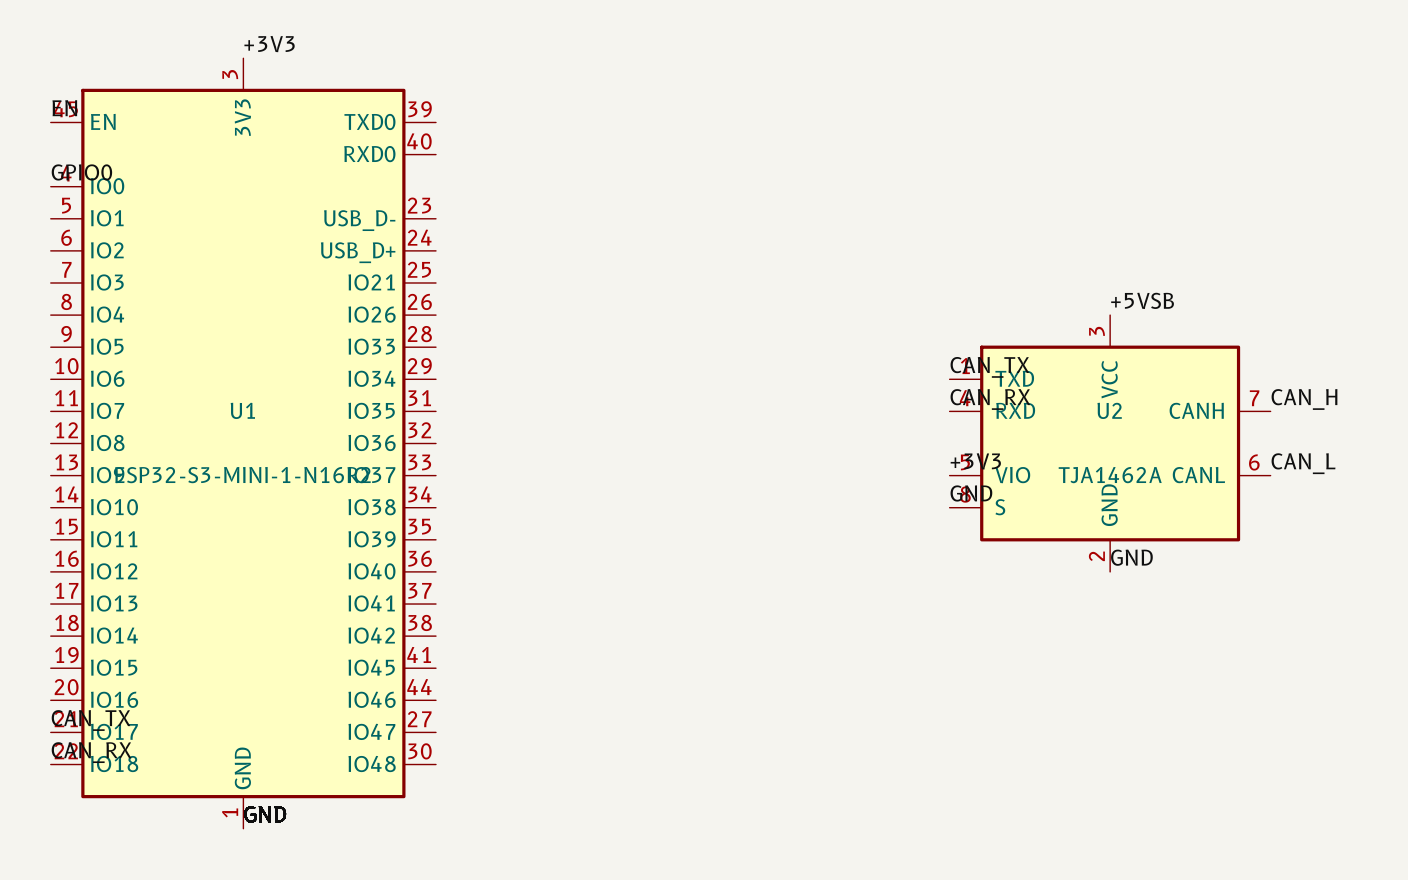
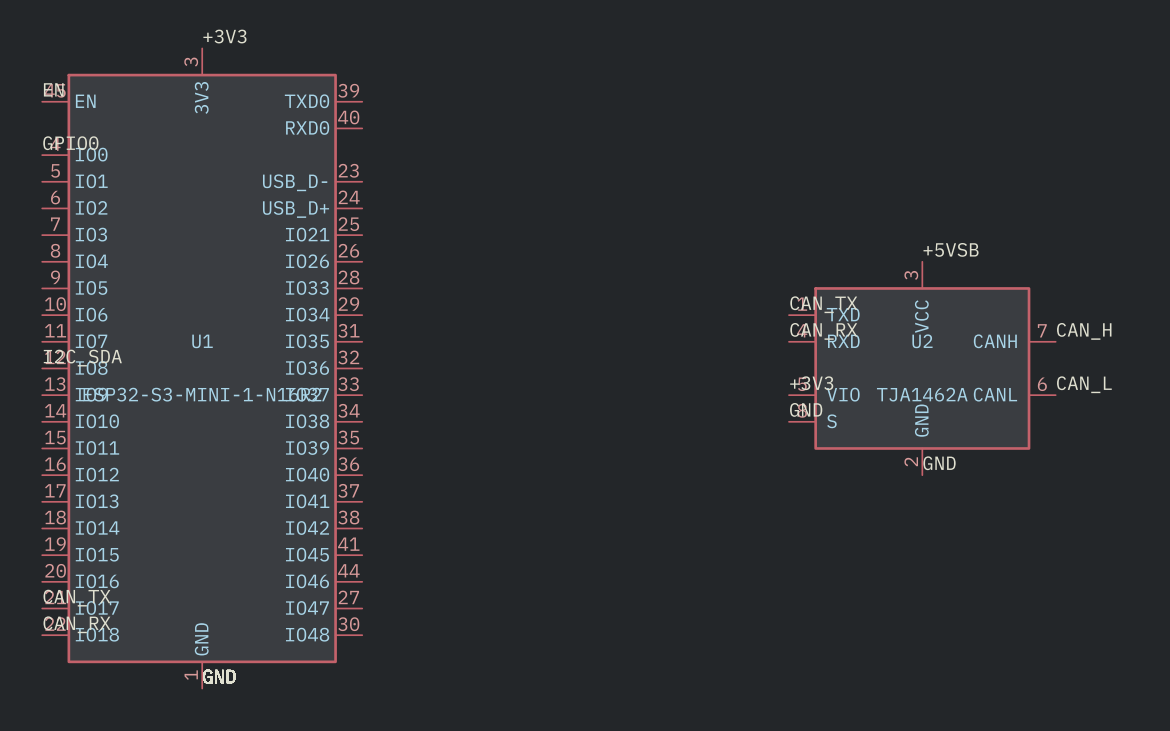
label: none -> I2C_SDA (82, 358)

